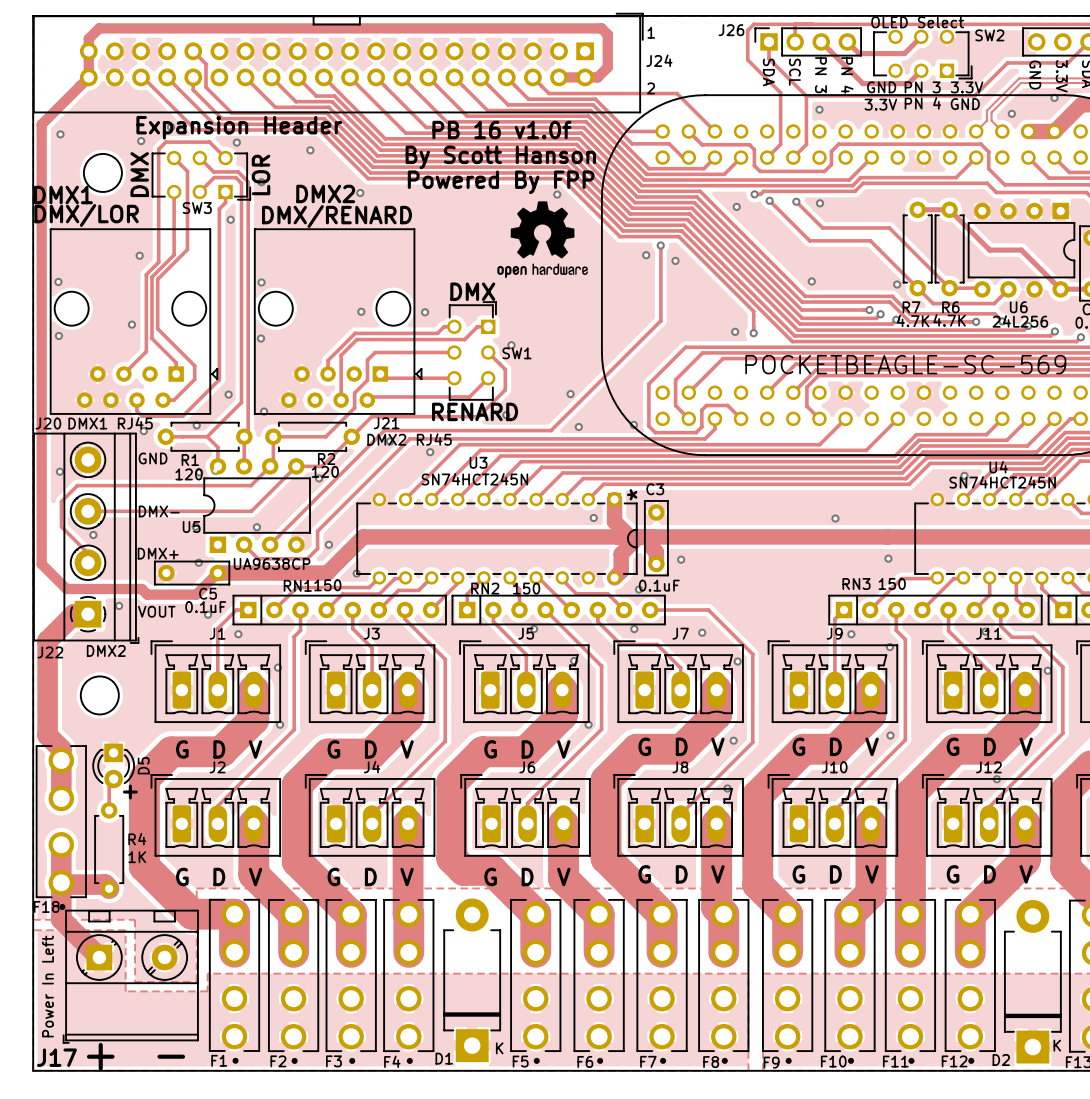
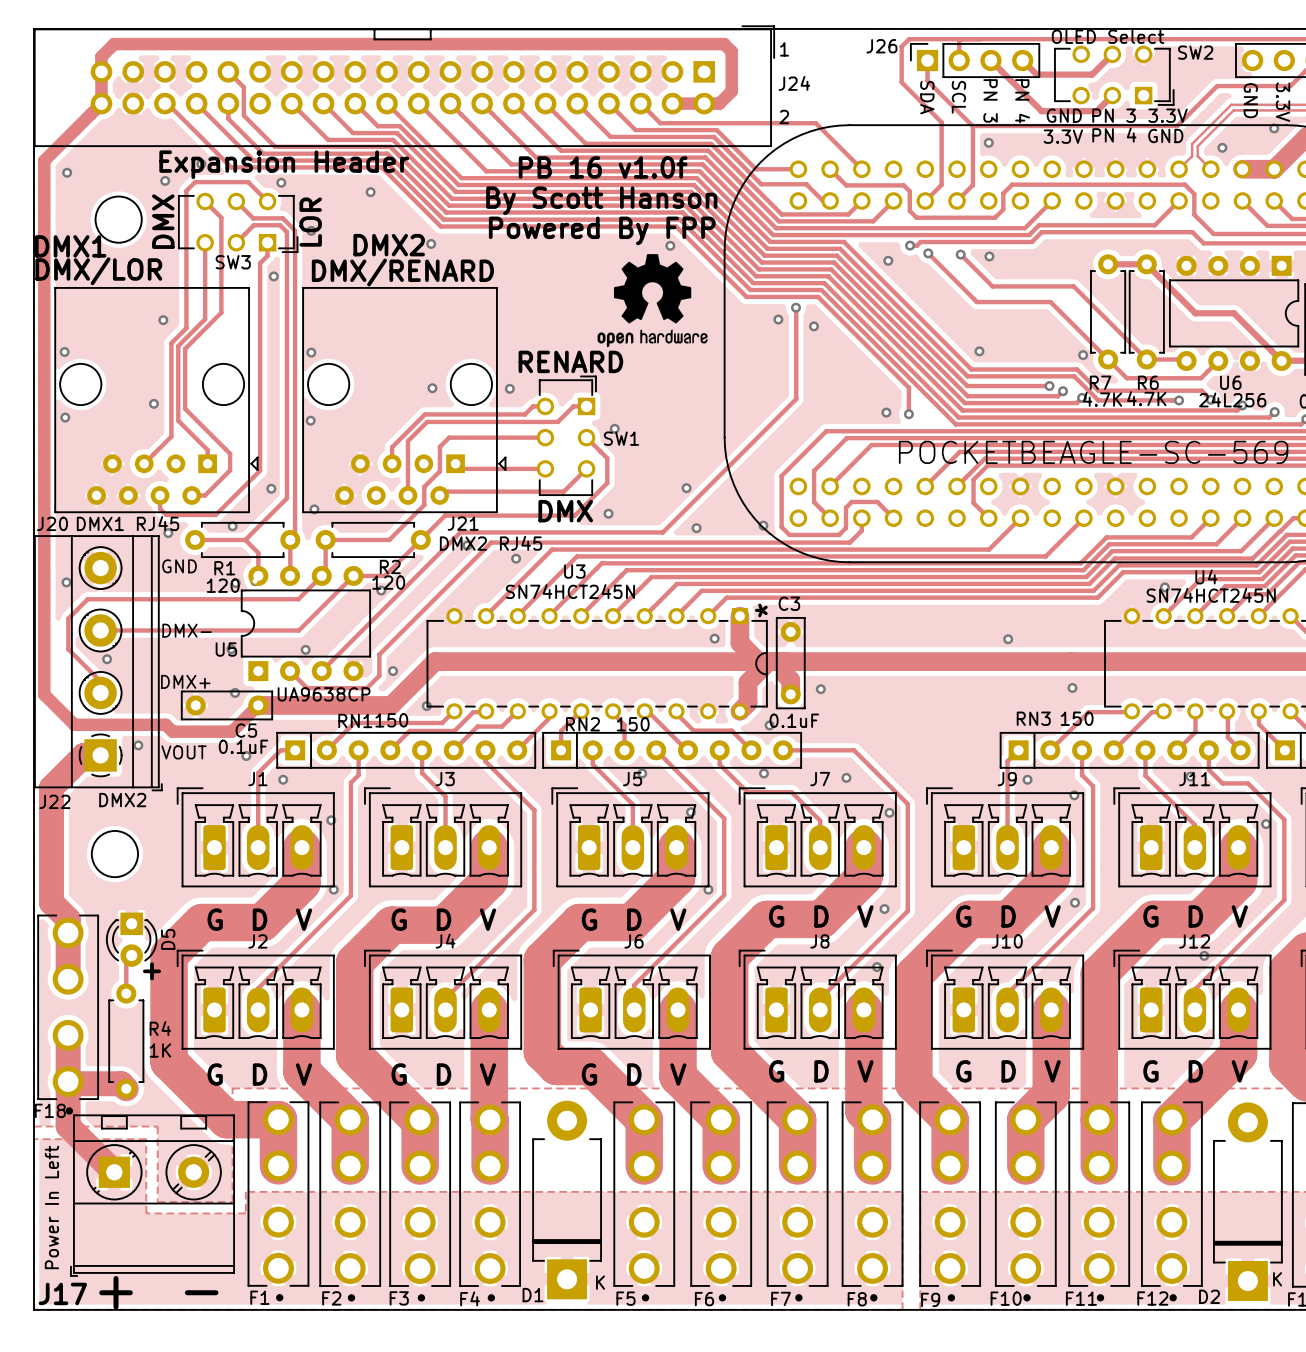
text position: DMX (472, 291) -> DMX (565, 511)
text position: RENARD (475, 411) -> RENARD (570, 361)

